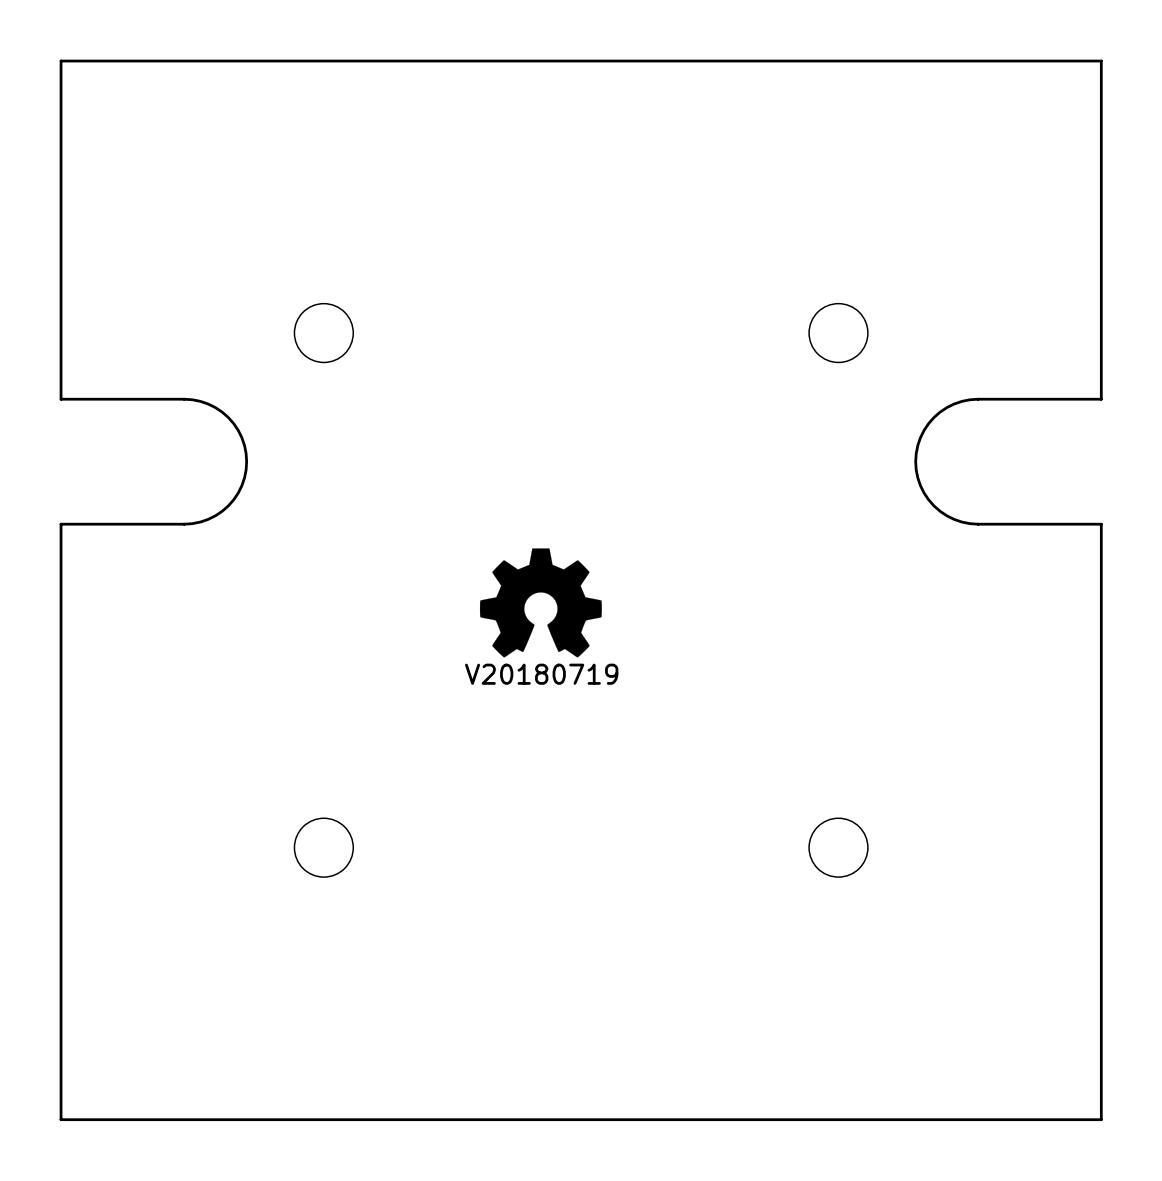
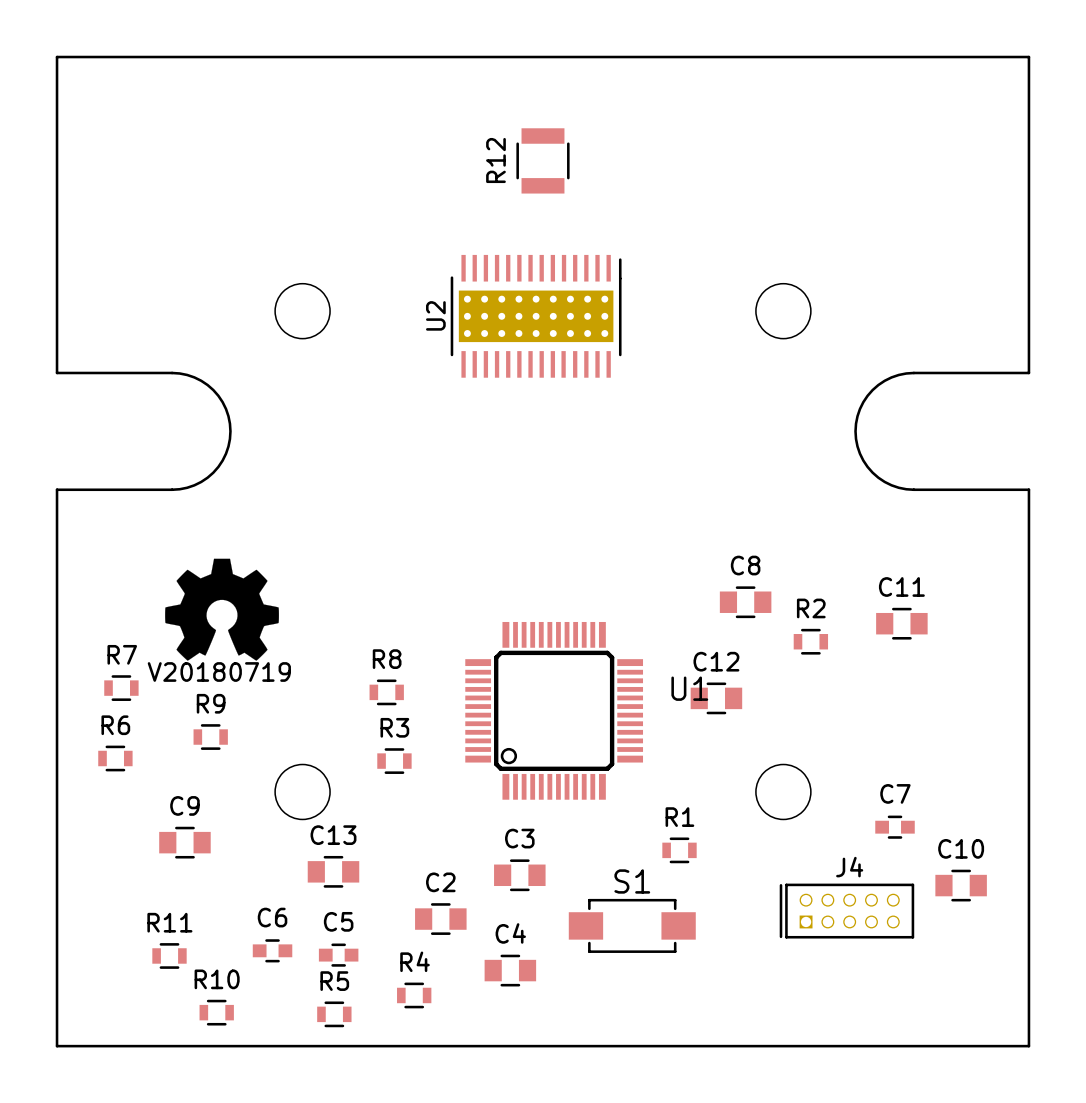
R12: none -> (542, 160)
U2: none -> (536, 316)
drawing position: (540, 602) -> (222, 609)
C8: none -> (745, 602)
C11: none -> (901, 623)
drawing position: (541, 674) -> (219, 671)
R2: none -> (810, 641)
R7: none -> (121, 688)
R8: none -> (386, 692)
C12: none -> (716, 698)
U1: none -> (554, 710)
R9: none -> (210, 737)
R6: none -> (115, 758)
R3: none -> (394, 761)
C7: none -> (895, 827)
C9: none -> (184, 842)
R1: none -> (679, 850)
C13: none -> (333, 871)
C3: none -> (519, 875)
C10: none -> (961, 885)
J4: none -> (846, 911)
C2: none -> (440, 919)
S1: none -> (632, 925)
C6: none -> (272, 950)
C5: none -> (338, 955)
R11: none -> (169, 955)
C4: none -> (510, 970)
R4: none -> (414, 995)
R10: none -> (216, 1012)
R5: none -> (334, 1014)

